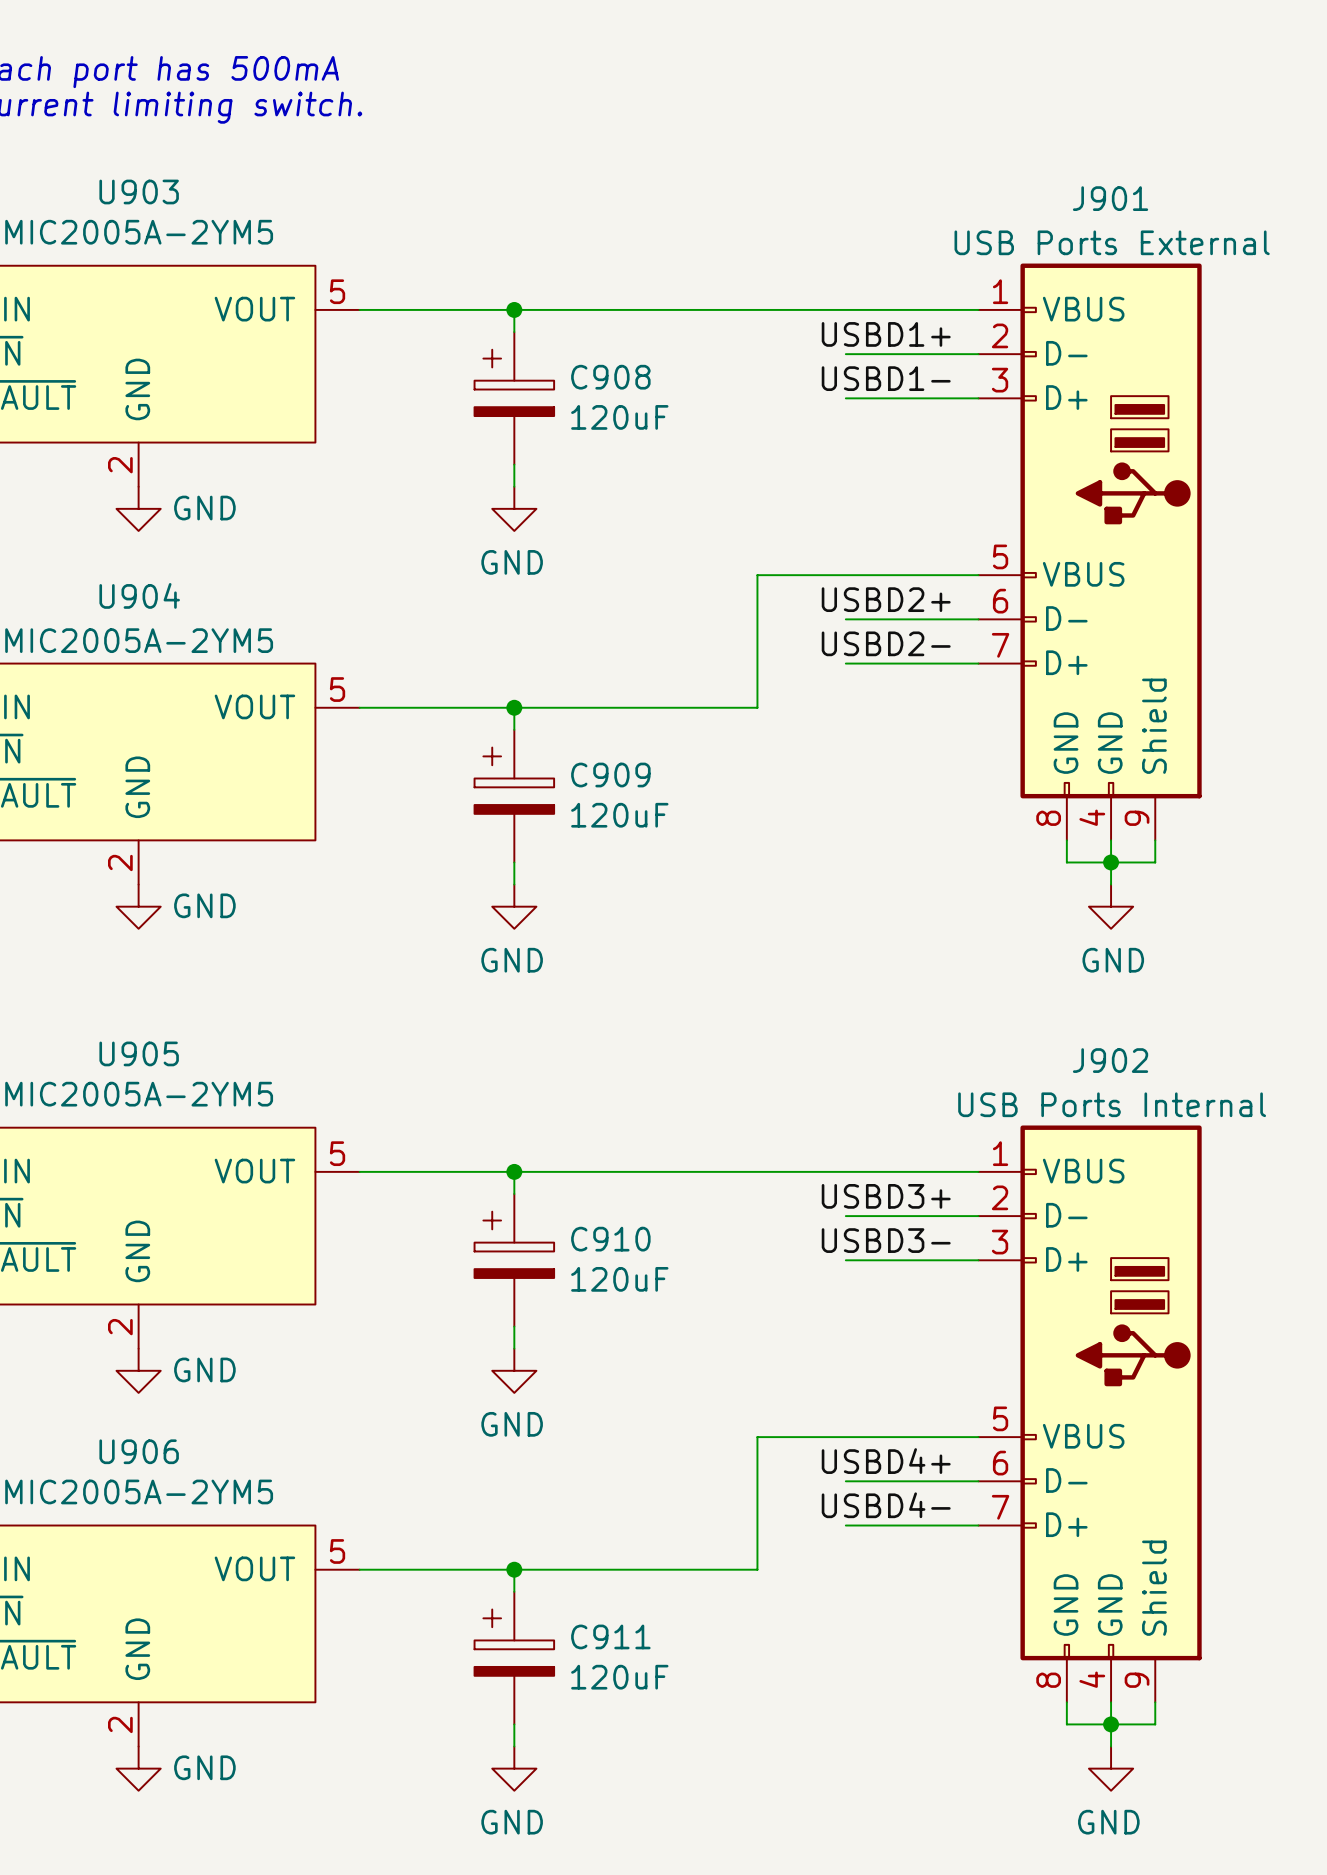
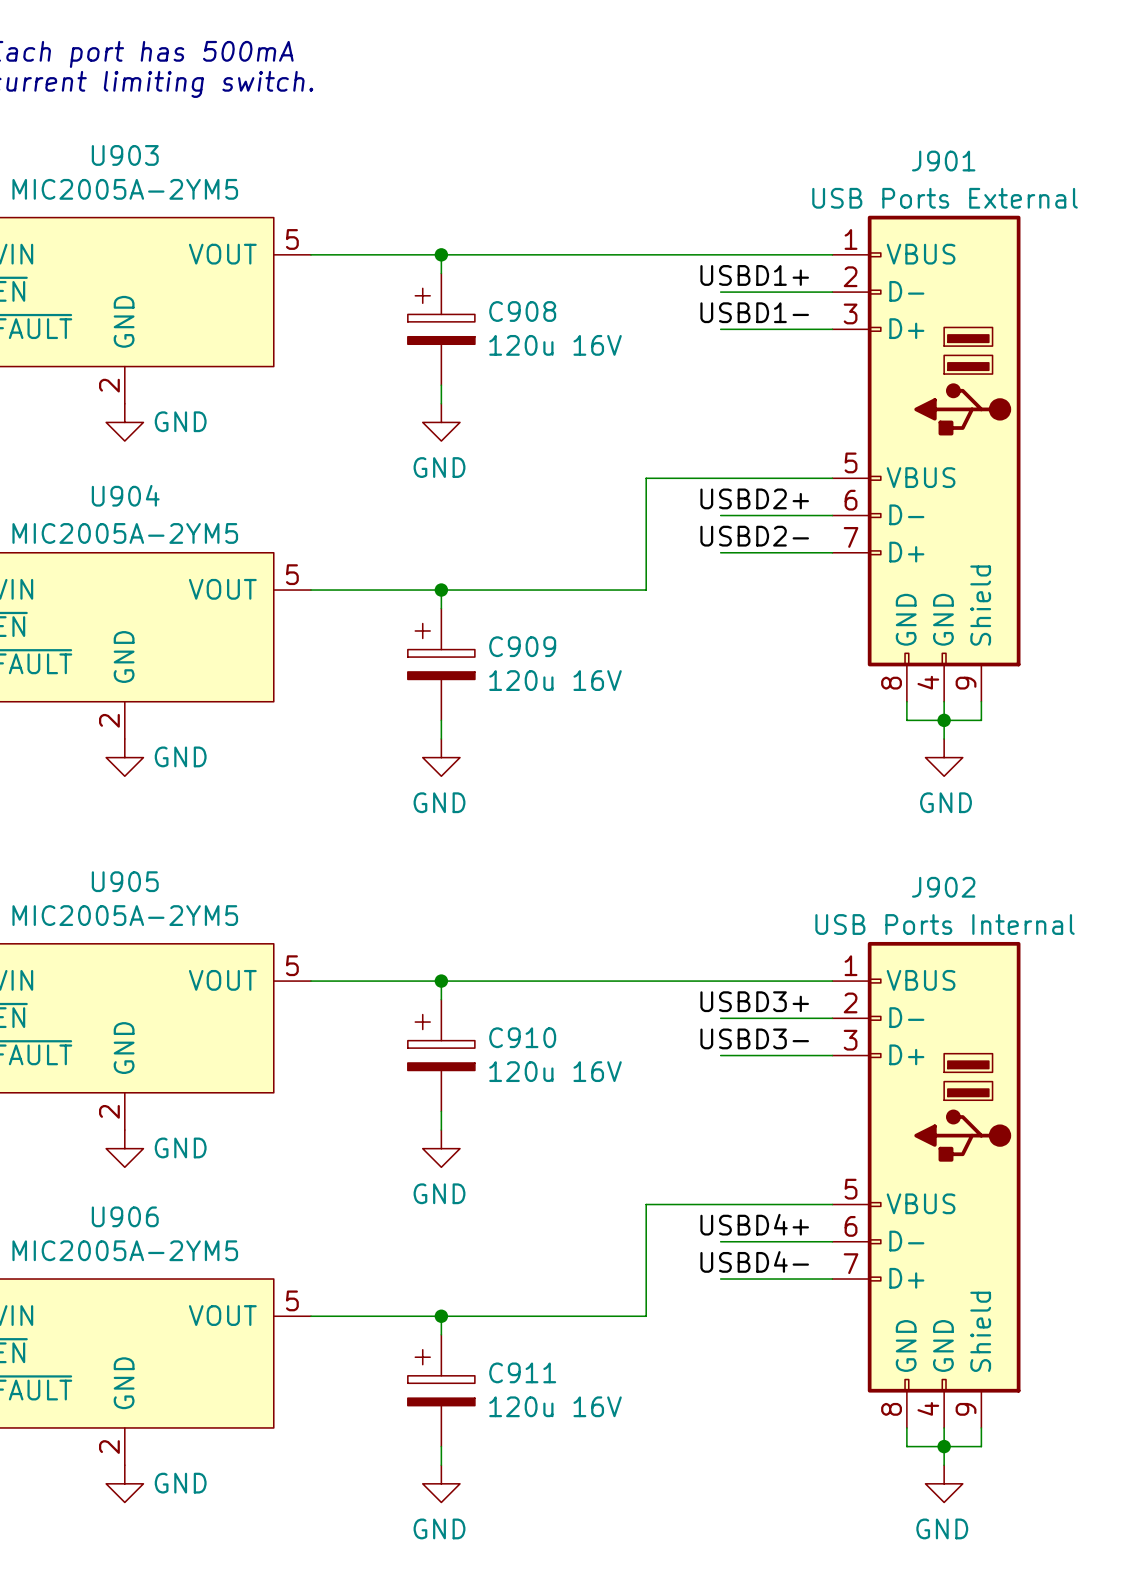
C908 value: 120uF (619, 417) -> 120u 16V (555, 345)
C909 value: 120uF (619, 815) -> 120u 16V (555, 680)
C910 value: 120uF (619, 1279) -> 120u 16V (555, 1071)
C911 value: 120uF (619, 1677) -> 120u 16V (555, 1406)

